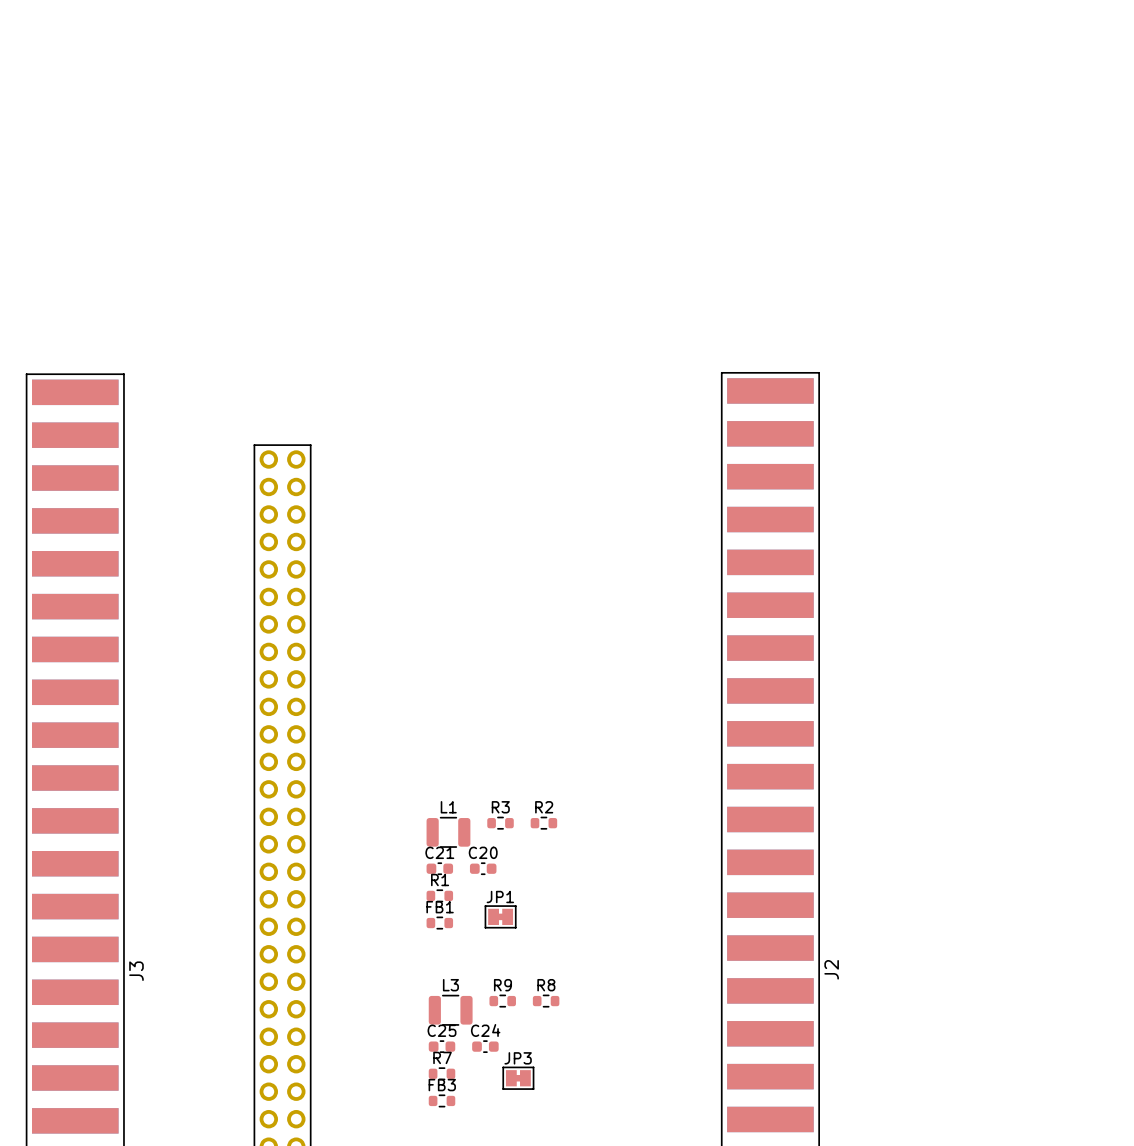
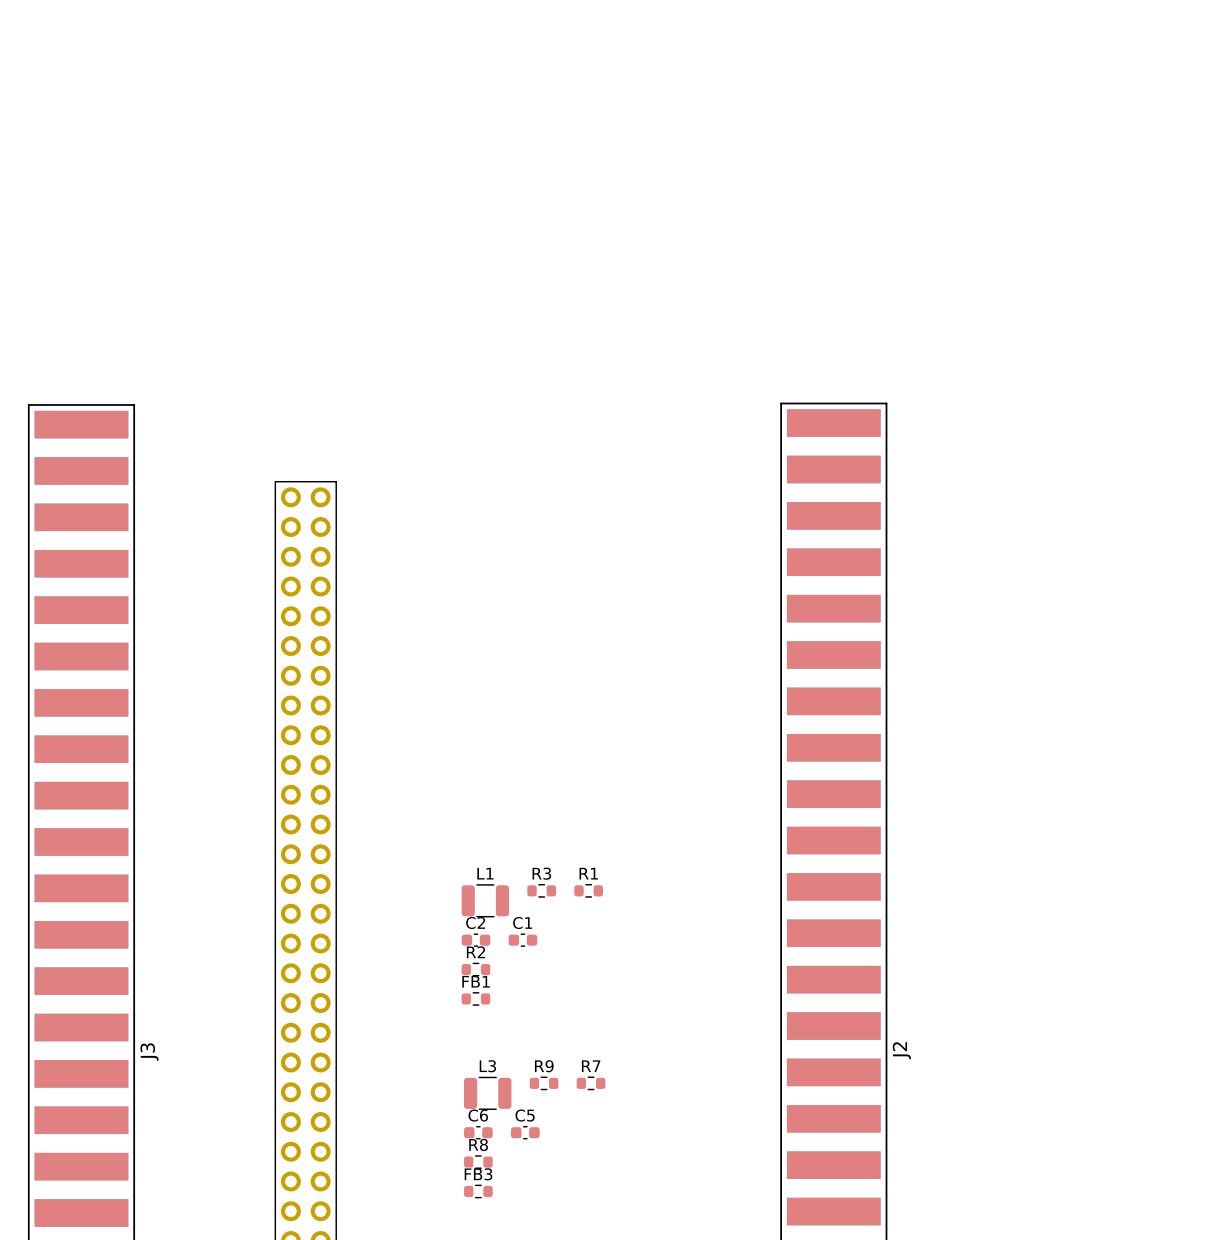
R2 name: R2 (544, 807) -> R1 (588, 873)
C21 name: C21 (439, 852) -> C2 (475, 922)
C20 name: C20 (483, 852) -> C1 (522, 922)
R1 name: R1 (440, 880) -> R2 (475, 952)
JP1: (500, 916) -> none
R8 name: R8 (546, 985) -> R7 (591, 1066)
C25 name: C25 (442, 1030) -> C6 (478, 1115)
C24 name: C24 (485, 1030) -> C5 (525, 1115)
R7 name: R7 (442, 1057) -> R8 (478, 1144)
JP3: (518, 1078) -> none

